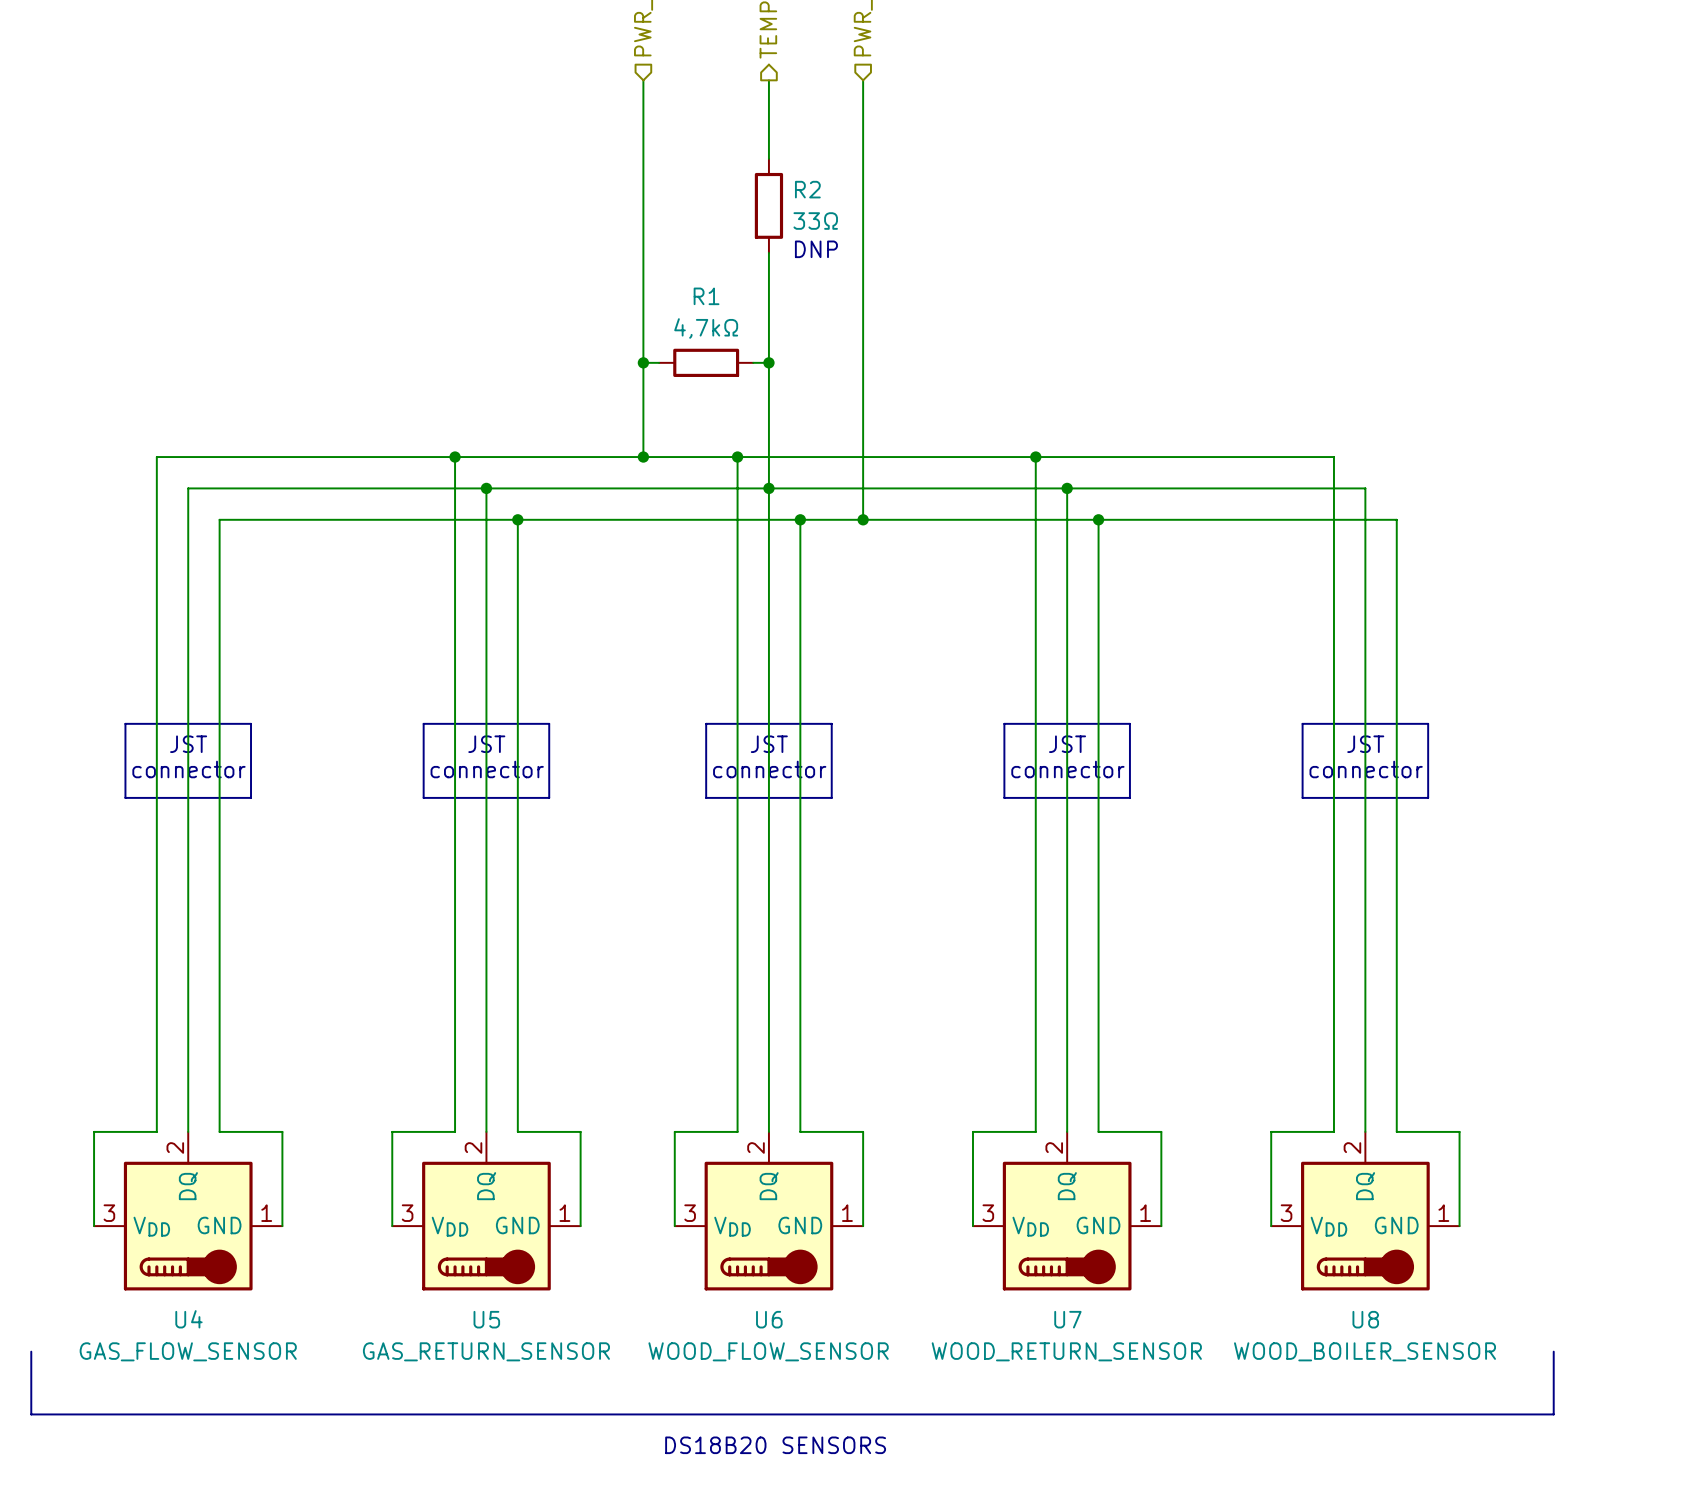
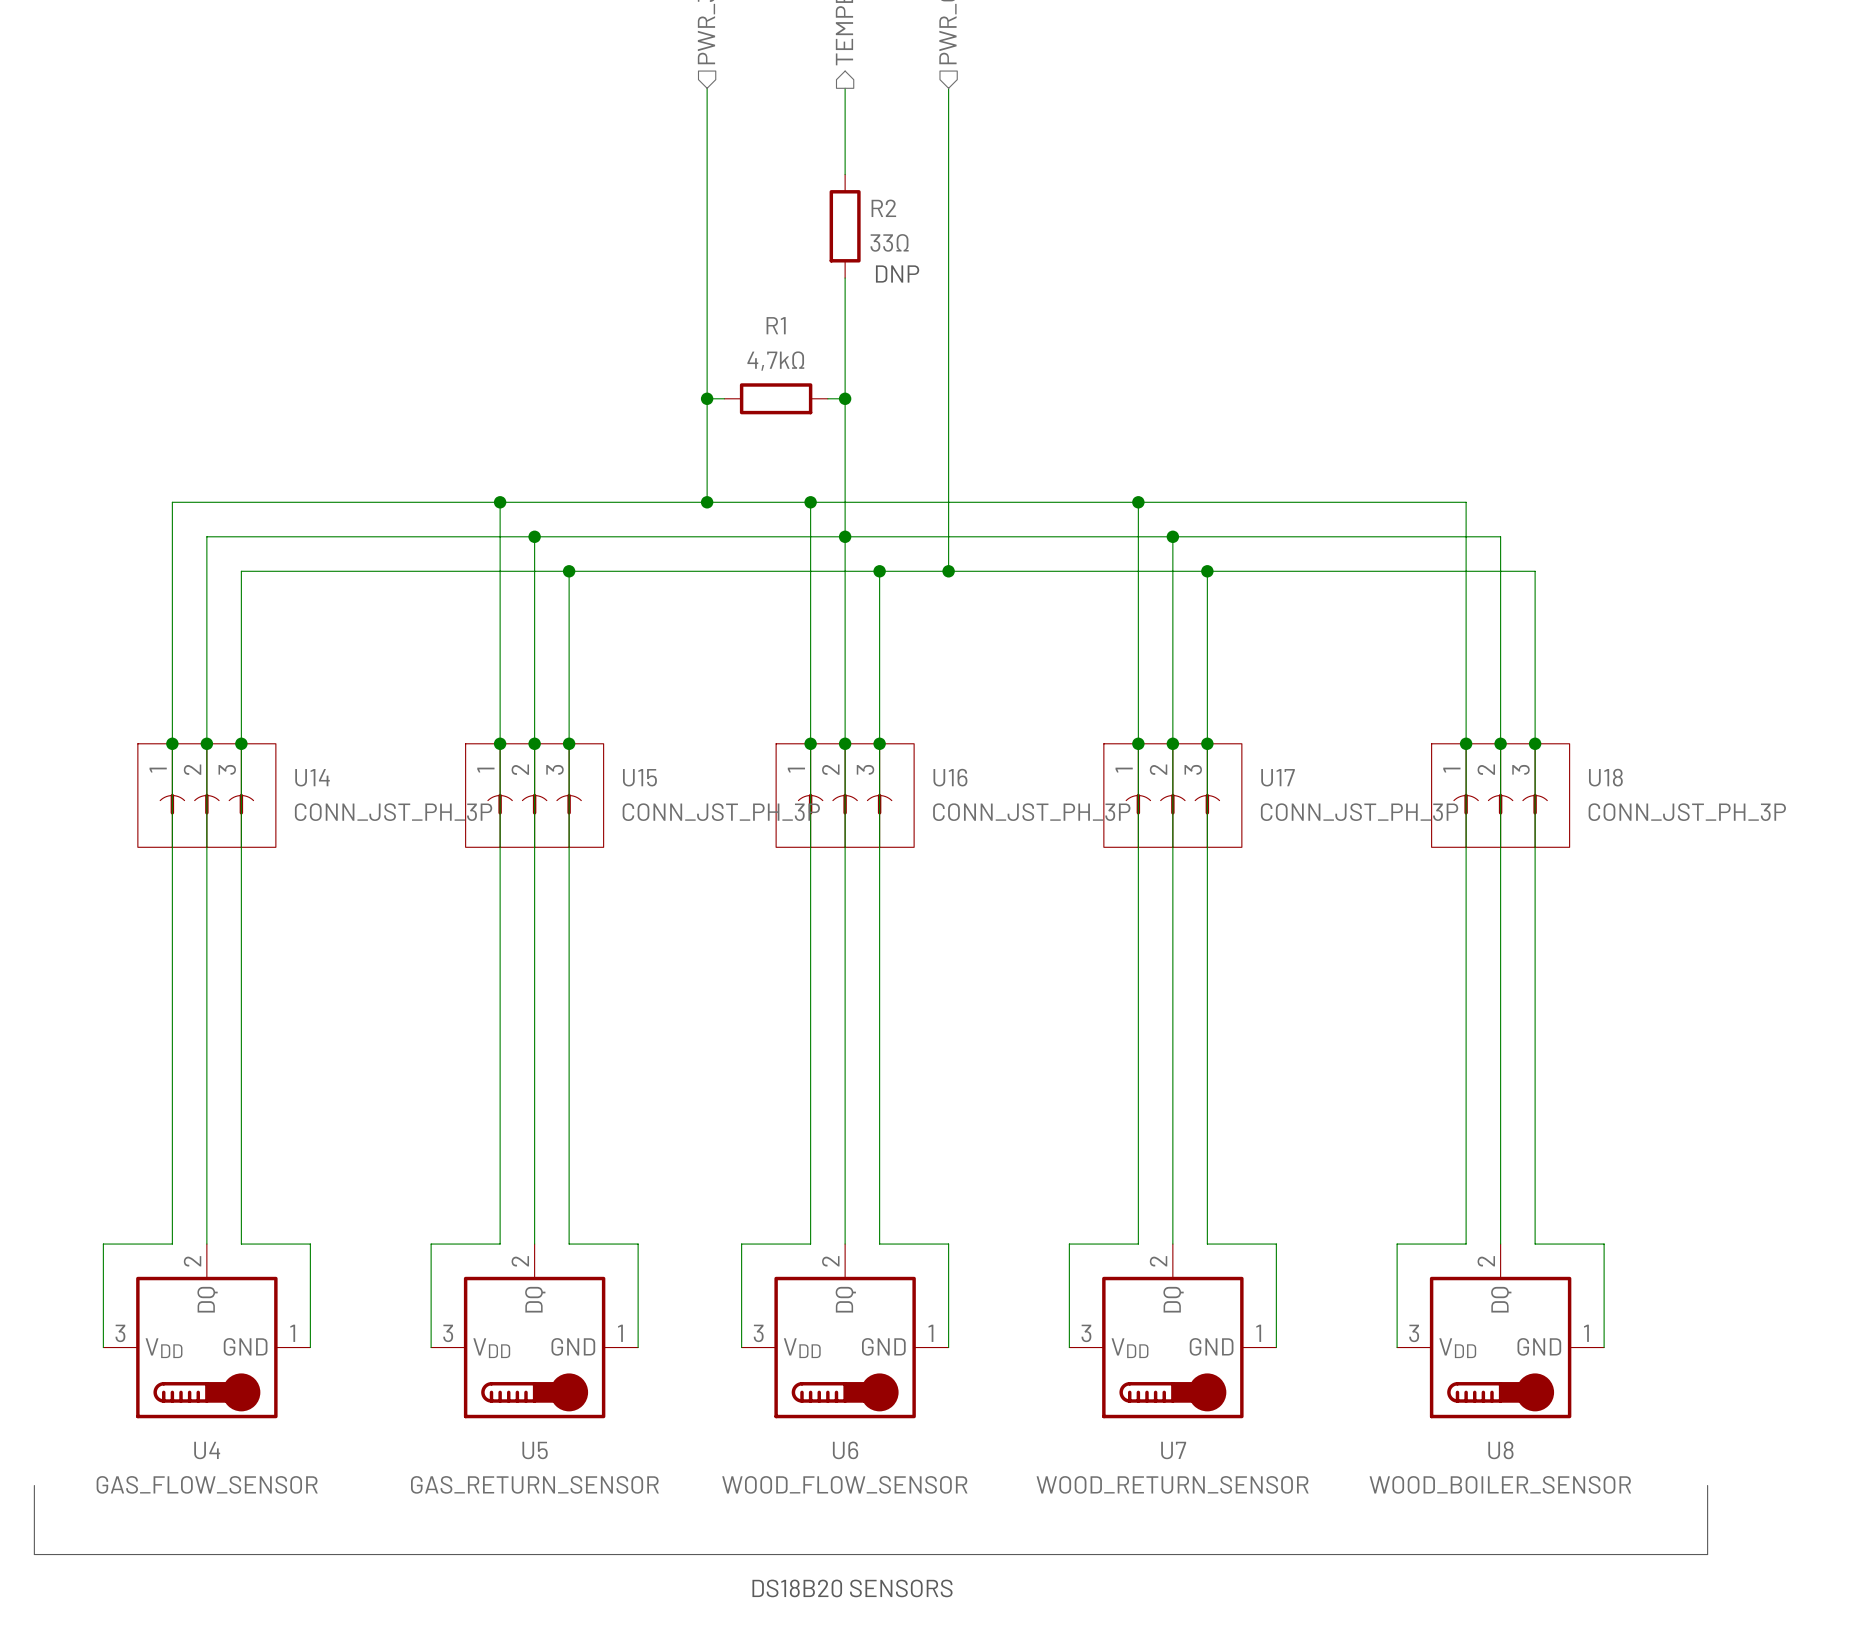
junction: none -> (172, 743)
junction: none -> (206, 743)
junction: none -> (241, 743)
junction: none -> (500, 743)
junction: none -> (534, 743)
junction: none -> (569, 743)
junction: none -> (810, 743)
junction: none -> (845, 743)
junction: none -> (879, 743)
junction: none -> (1138, 743)
junction: none -> (1172, 743)
junction: none -> (1207, 743)
junction: none -> (1466, 743)
junction: none -> (1500, 743)
junction: none -> (1535, 743)
line: (125, 723) (251, 723) (251, 797) (125, 797) (125, 723) -> none
U14: none -> CONN_JST_PH_3P (206, 795)
line: (423, 723) (549, 723) (549, 797) (423, 797) (423, 723) -> none
U15: none -> CONN_JST_PH_3P (534, 795)
line: (706, 723) (831, 723) (831, 797) (706, 797) (706, 723) -> none
U16: none -> CONN_JST_PH_3P (845, 795)
line: (1004, 723) (1129, 723) (1129, 797) (1004, 797) (1004, 723) -> none
U17: none -> CONN_JST_PH_3P (1172, 795)
line: (1302, 723) (1428, 723) (1428, 797) (1302, 797) (1302, 723) -> none
U18: none -> CONN_JST_PH_3P (1500, 795)
text: JST (188, 744) -> none
text: JST (486, 744) -> none
text: JST (769, 744) -> none
text: JST (1067, 744) -> none
text: JST (1365, 744) -> none
text: connector (188, 769) -> none
text: connector (487, 769) -> none
text: connector (769, 769) -> none
text: connector (1067, 769) -> none
text: connector (1366, 769) -> none

